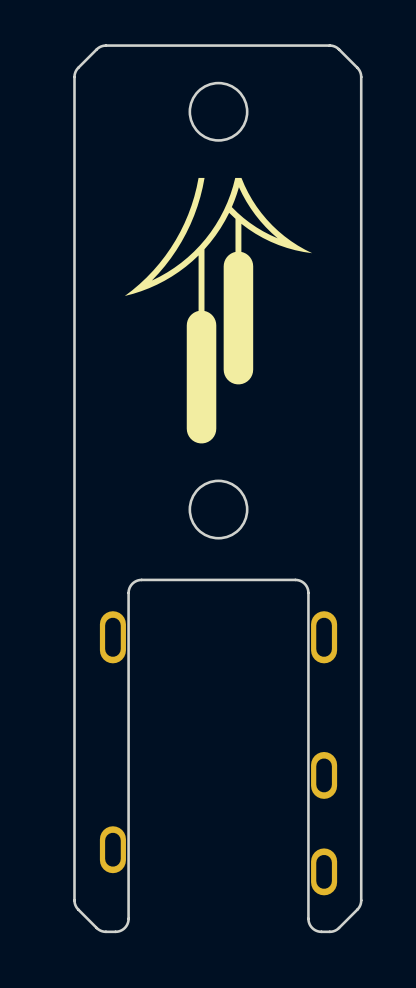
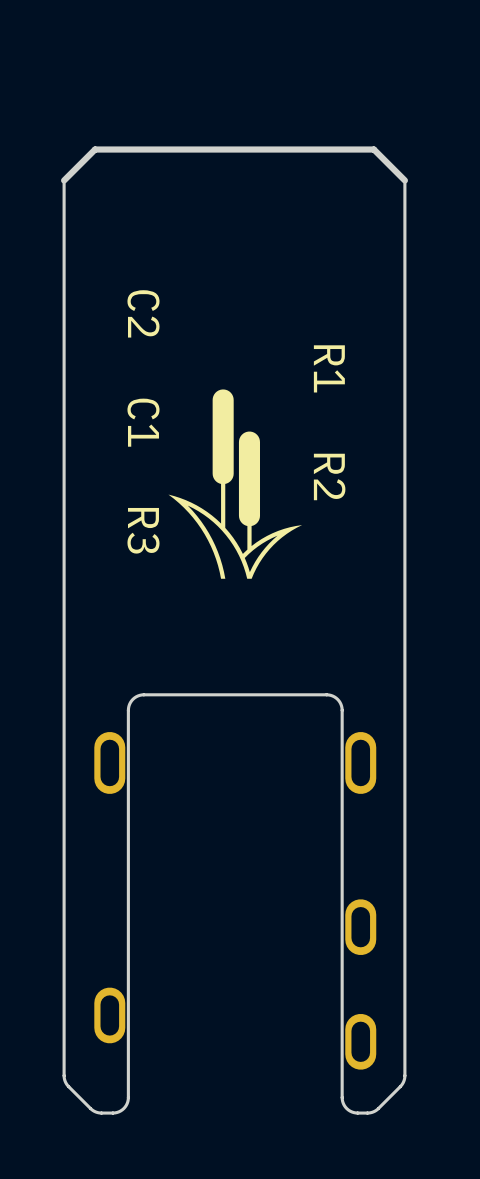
round board edge: [188, 81, 249, 142] -> none
board edge: (361, 147) (360, 73) (338, 48) (329, 45) (100, 46) (75, 73) (74, 147) -> (404, 180) (373, 149) (95, 149) (64, 180)
drawing: [124, 177, 313, 444] -> none
C2: none -> (143, 313)
R1: none -> (329, 368)
drawing: none -> [168, 389, 303, 579]
C1: none -> (143, 422)
R2: none -> (329, 476)
R3: none -> (143, 530)
round board edge: [188, 479, 249, 540] -> none

